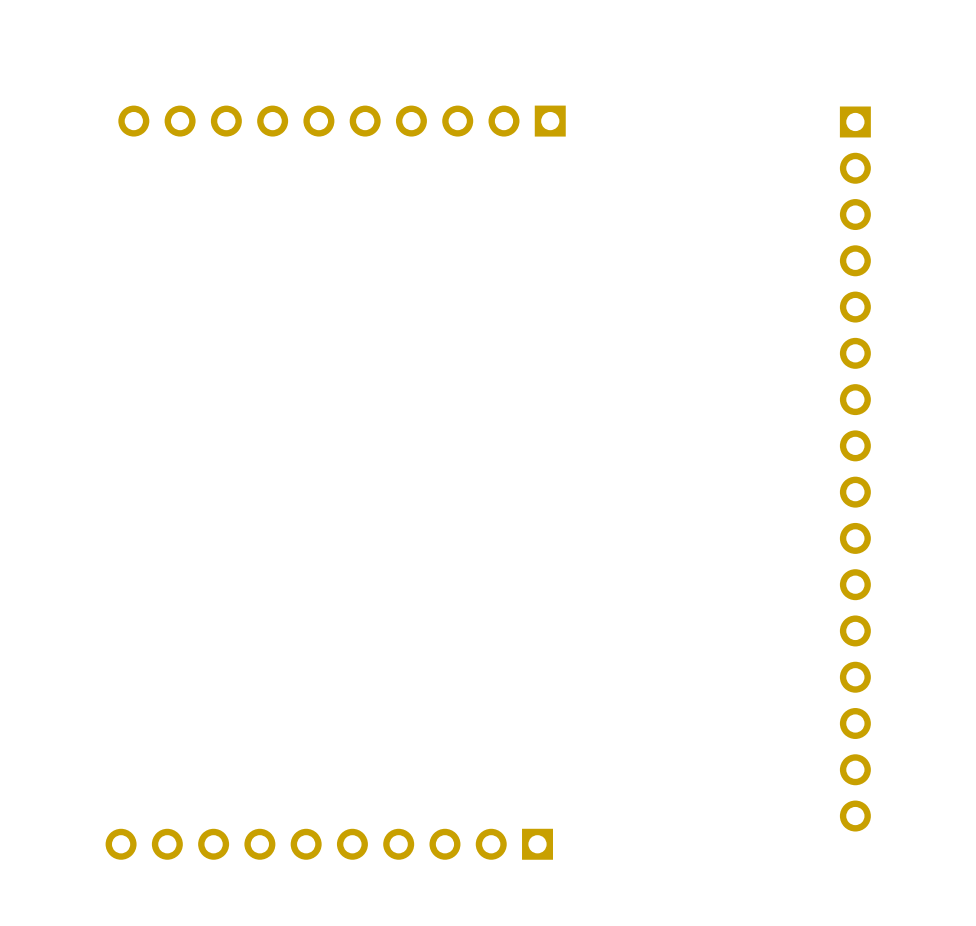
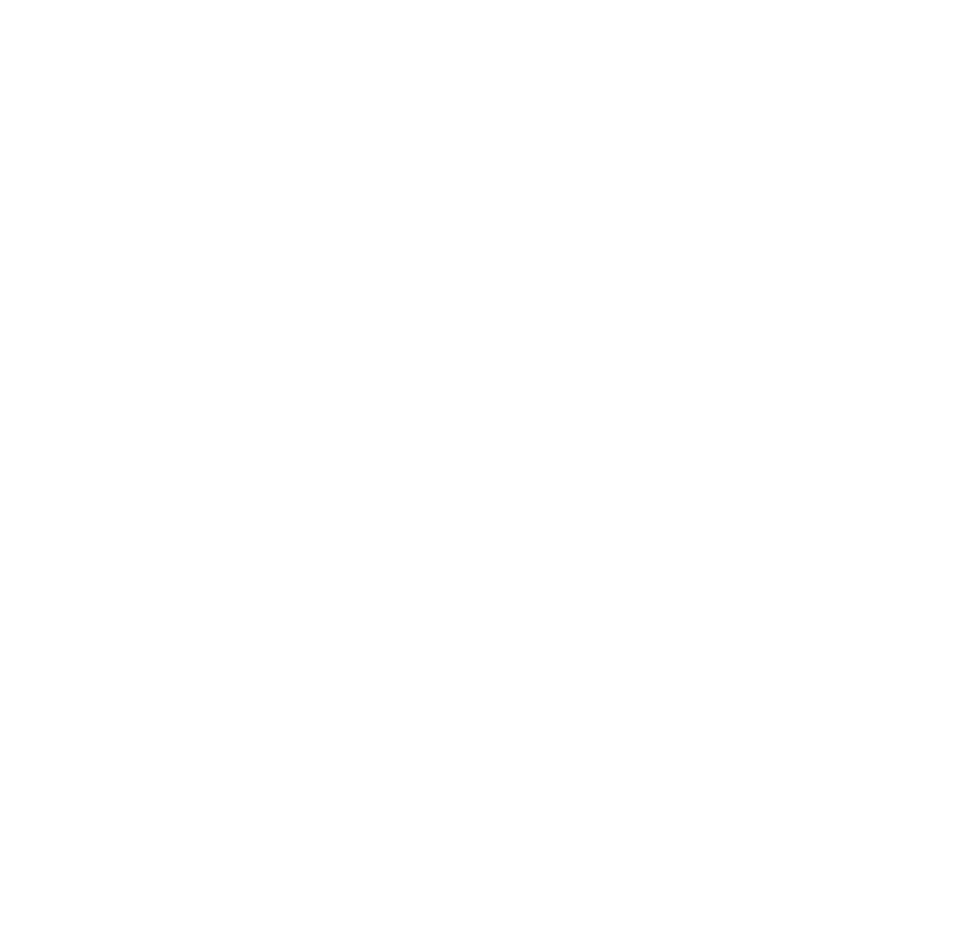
part: (342, 121) -> none
part: (855, 469) -> none
part: (329, 844) -> none

